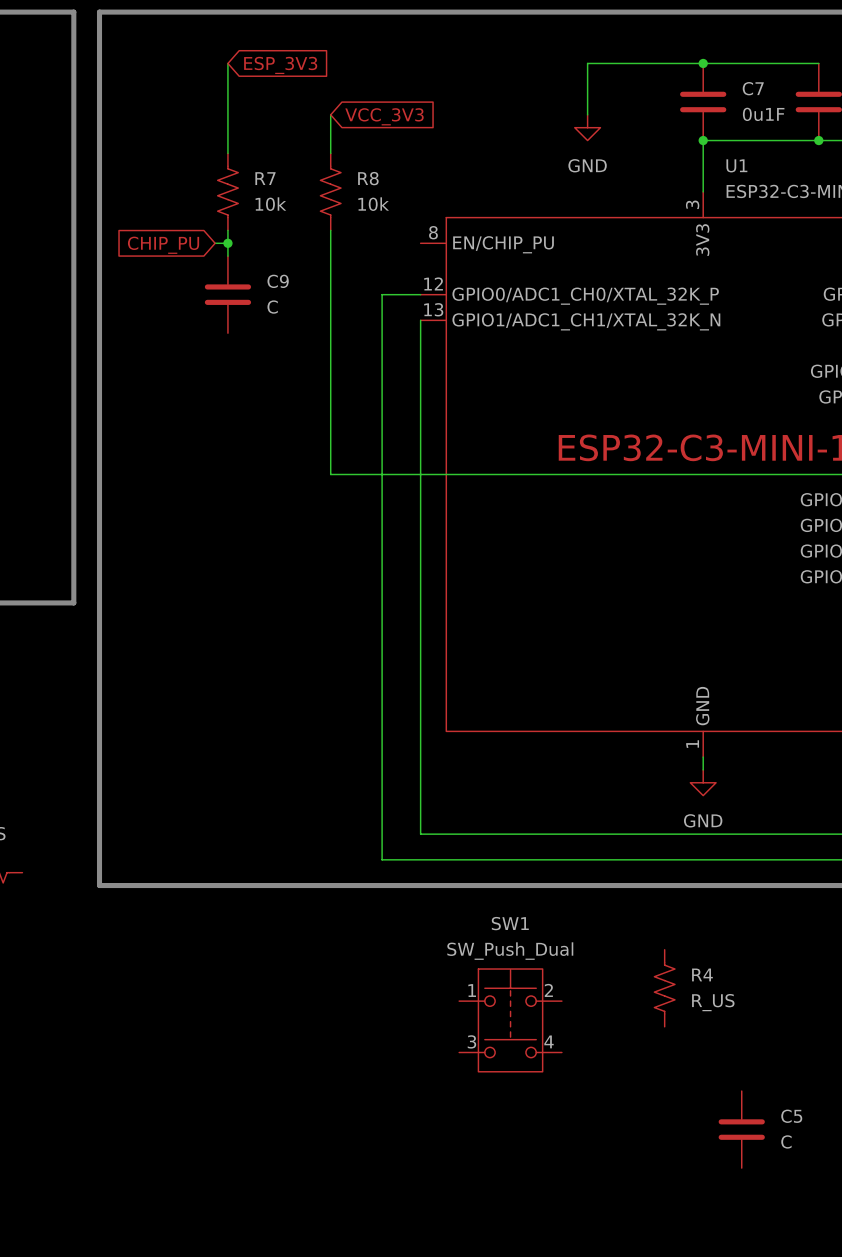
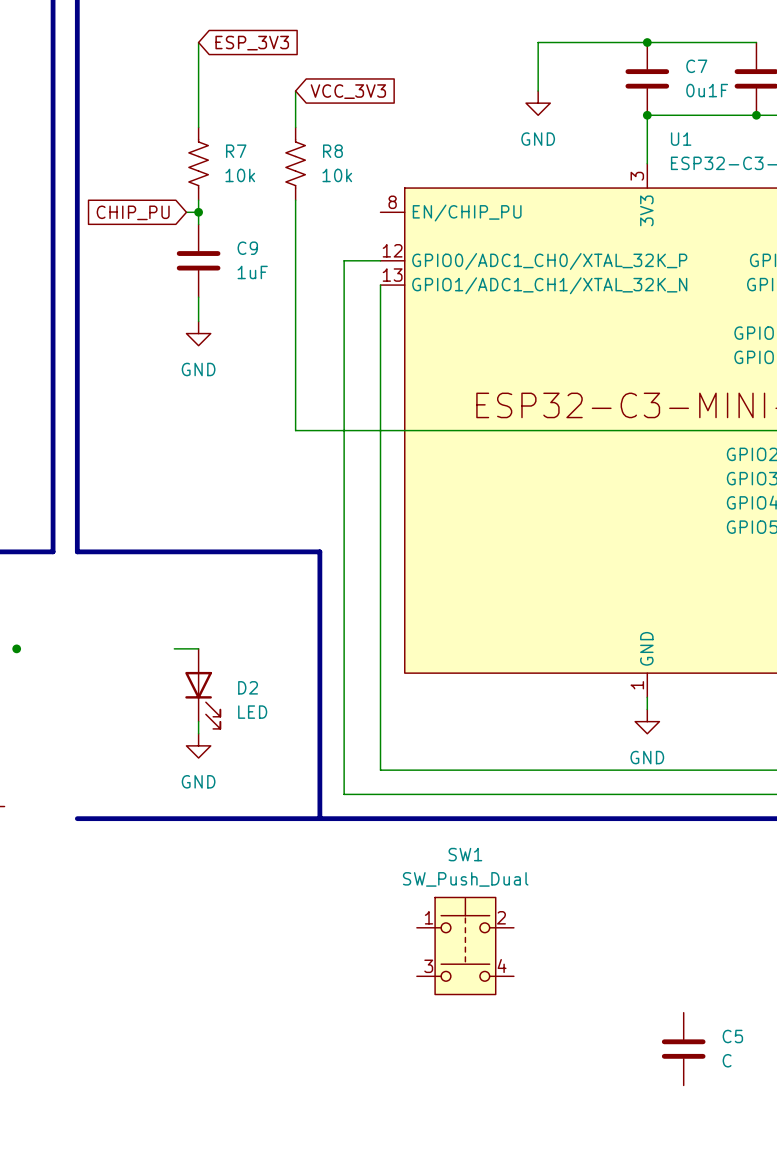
C9 value: C (272, 307) -> 1uF (252, 272)
wire: none -> (198, 297) (198, 321)
power symbol: none -> GND (198, 333)
line: (99, 602) (99, 885) -> (77, 551) (319, 551) (319, 818)
junction: none -> (16, 648)
wire: none -> (174, 648) (198, 648)
D2: none -> LED (202, 688)
wire: none -> (198, 721) (198, 733)
power symbol: none -> GND (198, 745)
R4: R_US (664, 988) -> none

